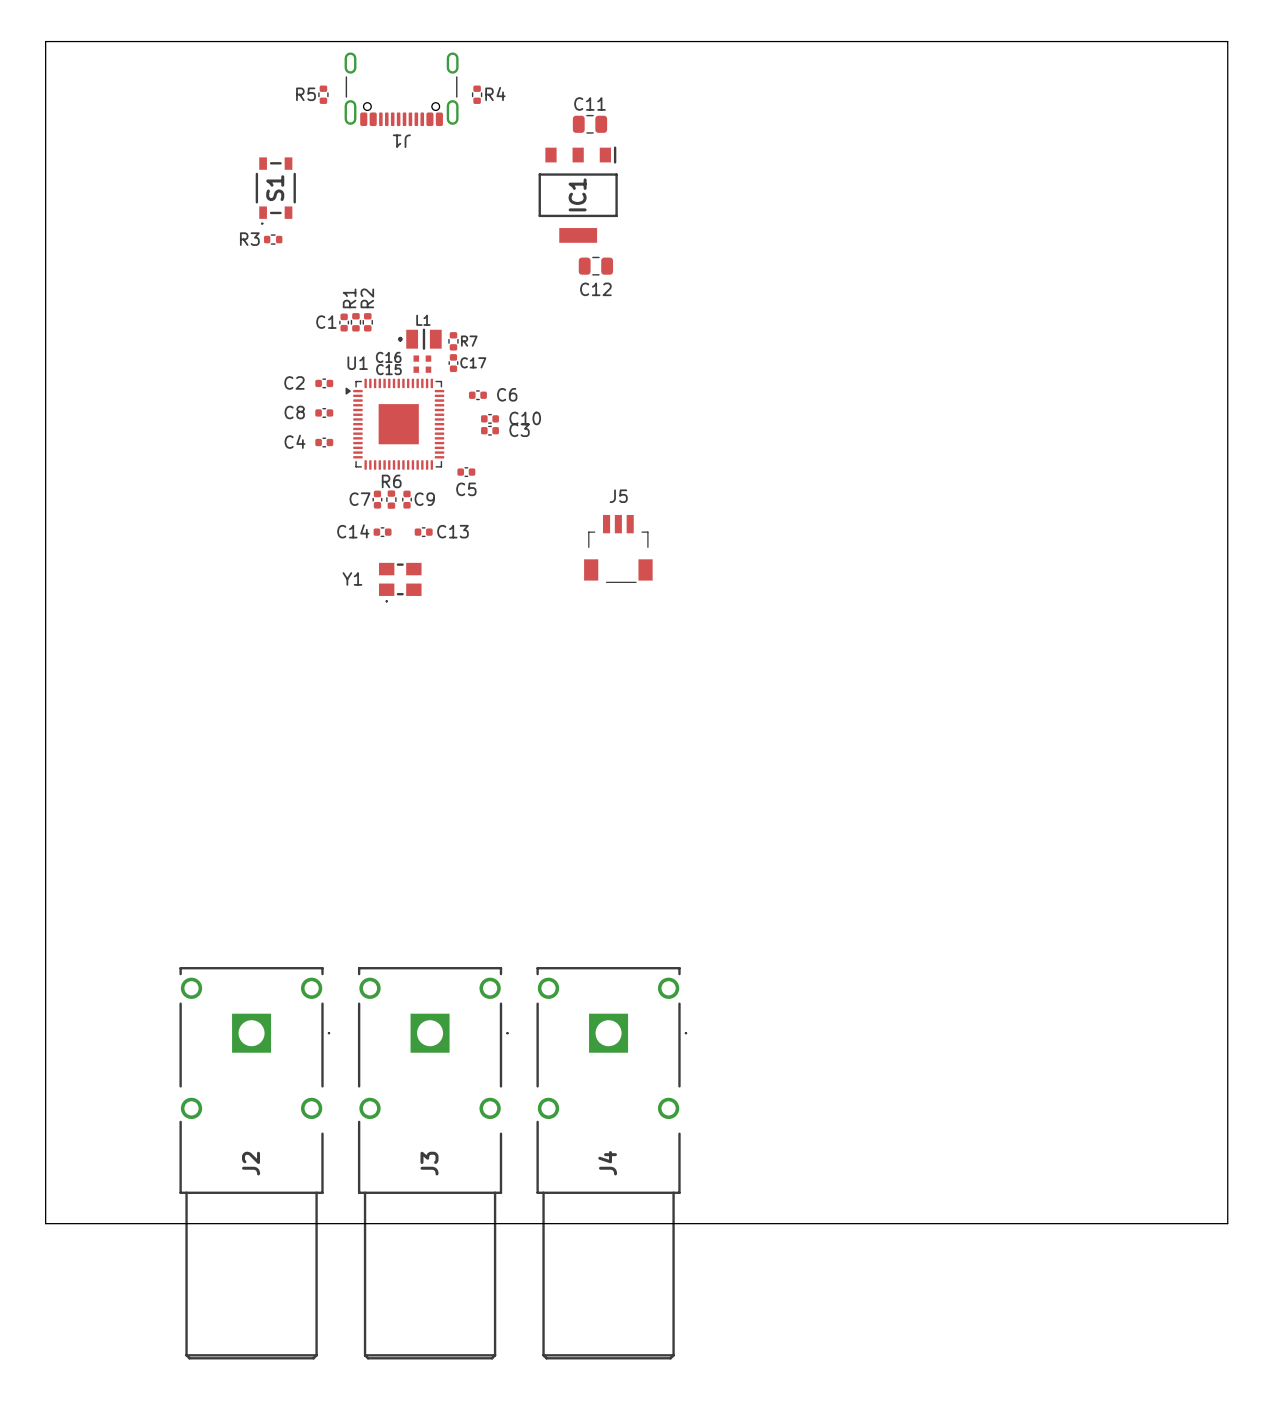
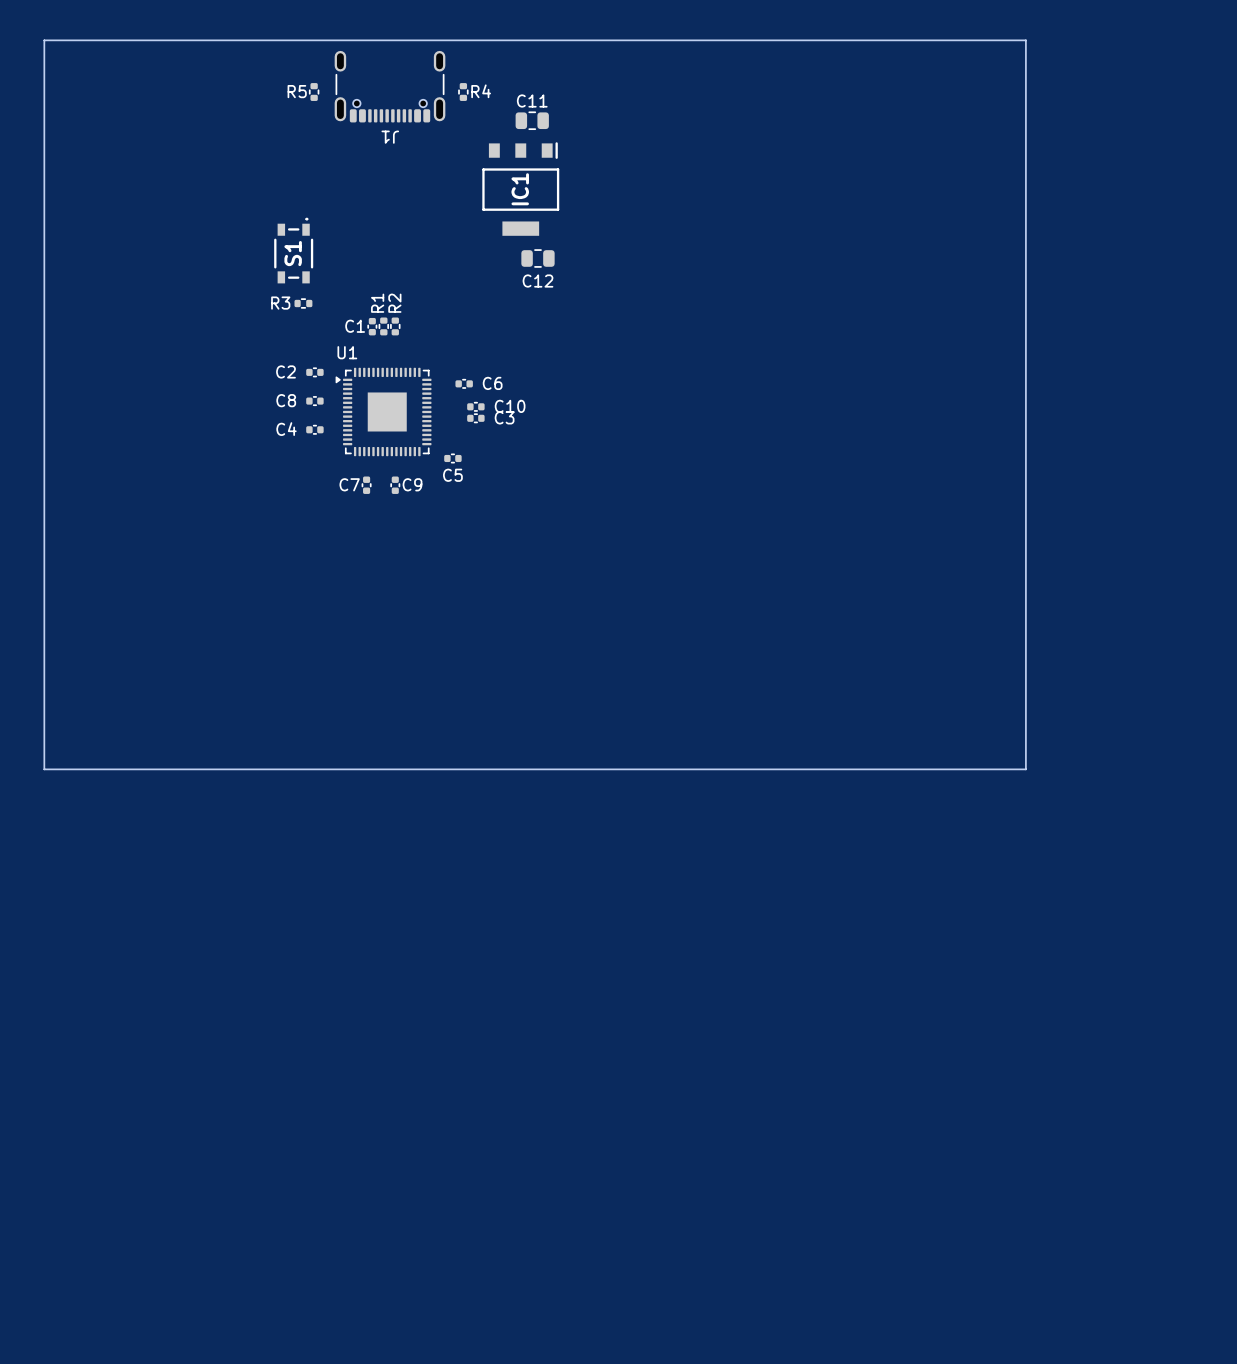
board edge: (1056, 41) (1227, 41) (1227, 1223) (45, 1223) (45, 792) -> (1025, 40) (1025, 769) (44, 769)
C11 position: (589, 124) -> (532, 120)
S1 rotation: 0° (275, 191) -> 180° (293, 250)
S1 position: (275, 191) -> (293, 250)
IC1 position: (578, 194) -> (520, 189)
R3 position: (273, 239) -> (303, 303)
C12 position: (595, 266) -> (537, 258)
C1 position: (344, 322) -> (372, 326)
R1 position: (355, 322) -> (383, 326)
R2 position: (367, 322) -> (395, 326)
L1: (419, 339) -> none
R7: (453, 341) -> none
C16: (422, 358) -> none
C17: (453, 363) -> none
C15: (422, 369) -> none
R6: (391, 499) -> none
C14: (382, 532) -> none
C13: (423, 532) -> none
J5: (618, 548) -> none
Y1: (400, 582) -> none
J2: (254, 1163) -> none
J3: (433, 1163) -> none
J4: (611, 1163) -> none

